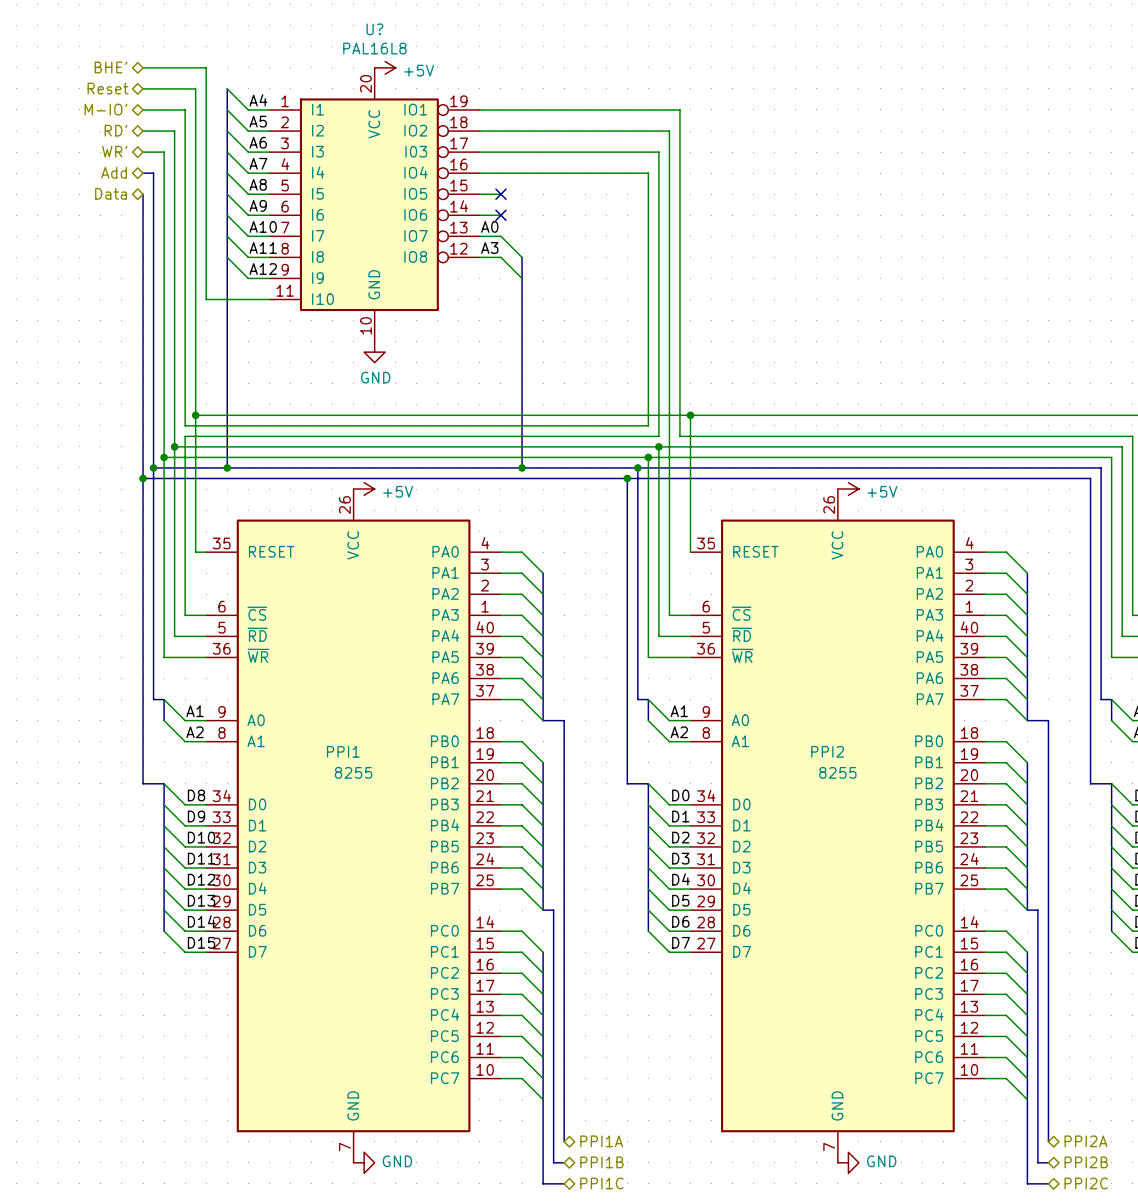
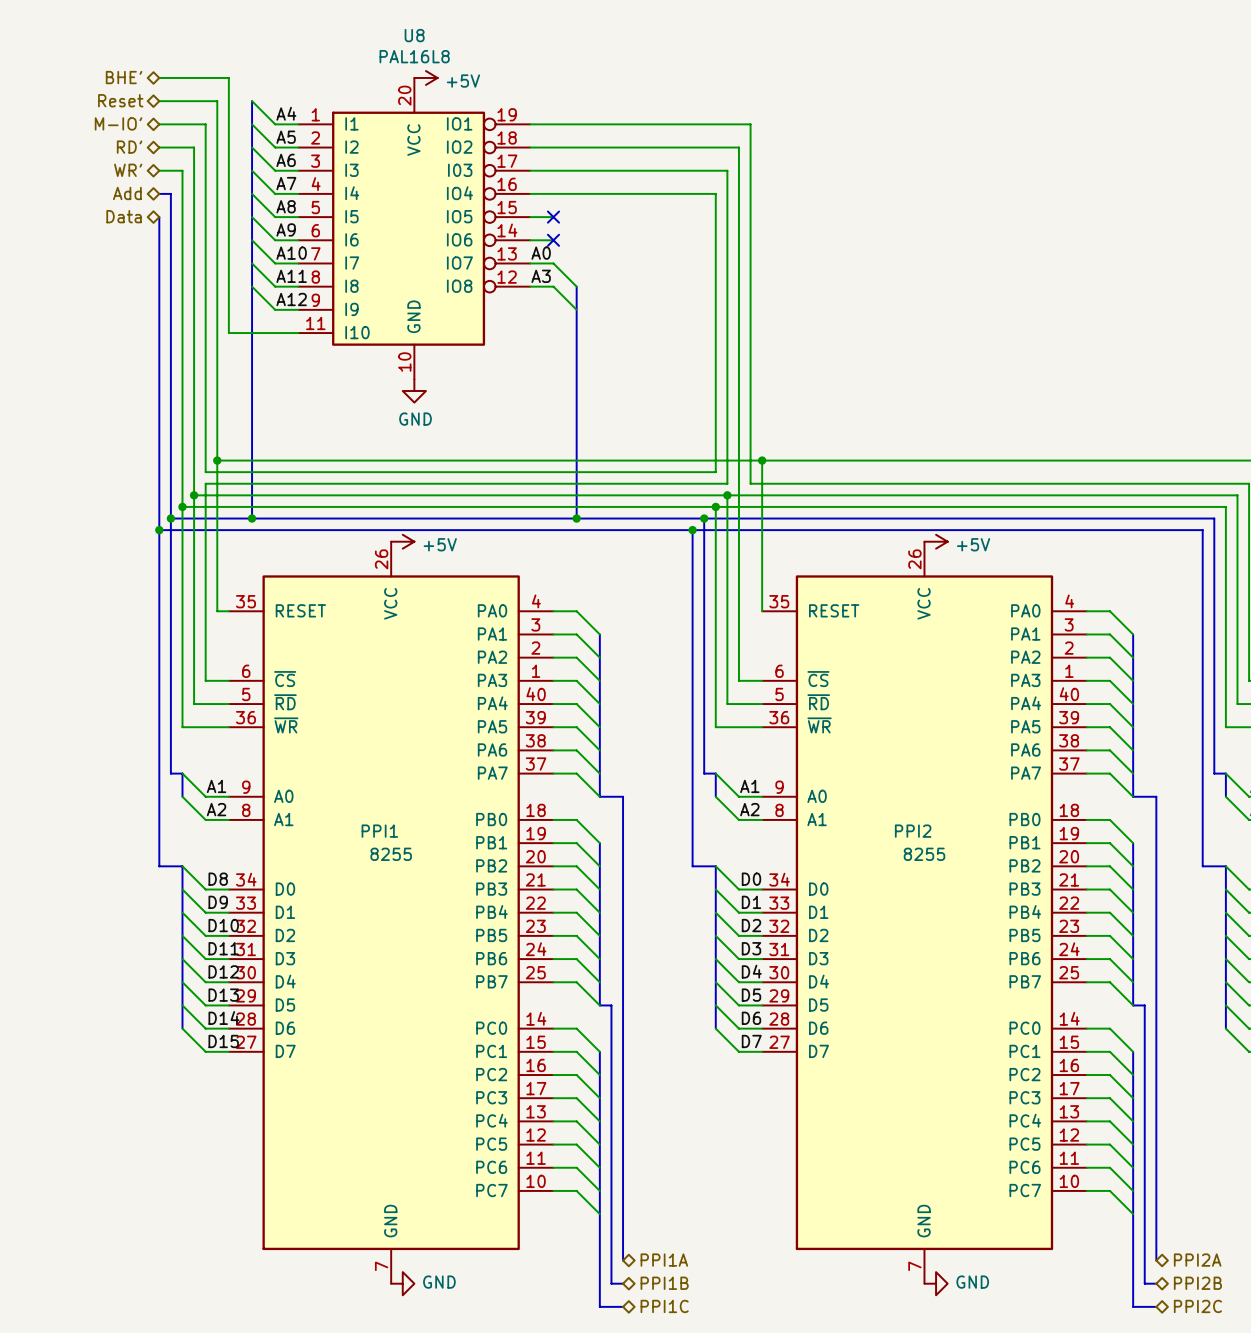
U? name: U? (374, 29) -> U8 (414, 35)

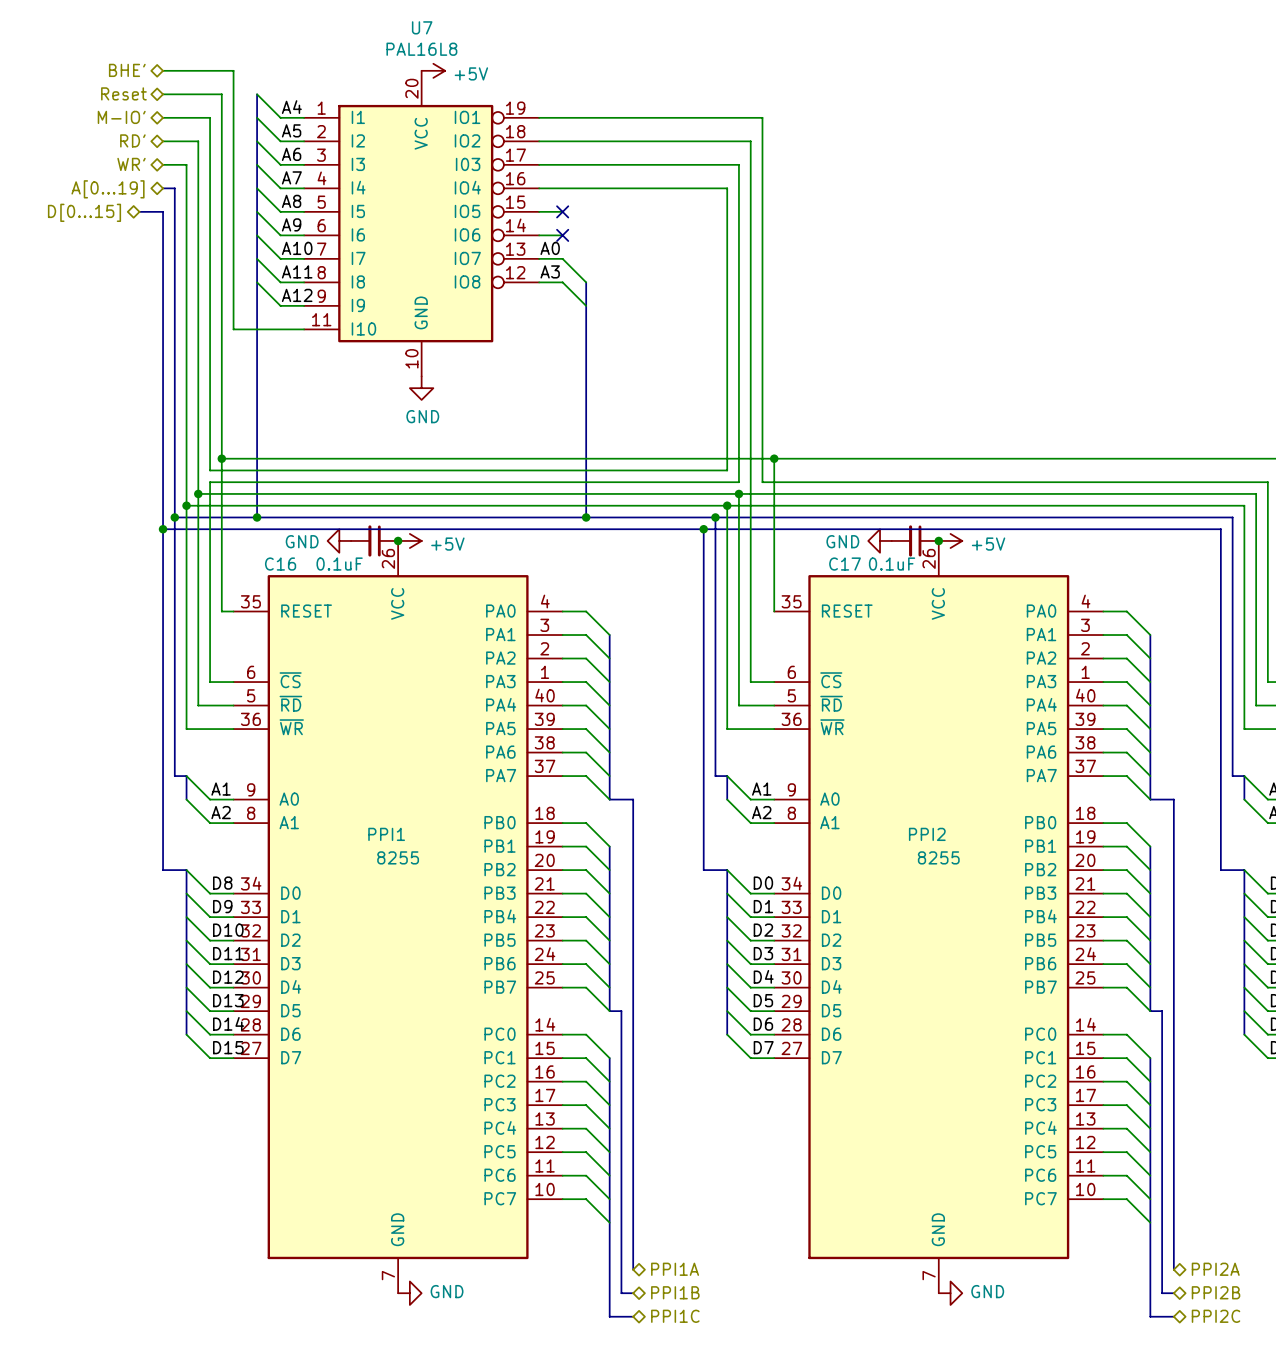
U8 name: U8 (414, 35) -> U7 (422, 27)
hierarchical label: Add (127, 193) -> A[0...19] (108, 189)
hierarchical label: Data (124, 216) -> none
bus: none -> (139, 211) (163, 211)
hierarchical label: none -> D[0...15] (84, 212)
power symbol: none -> GND (339, 540)
C16: none -> 0.1uF (374, 540)
junction: none -> (398, 540)
power symbol: none -> GND (880, 540)
C17: none -> 0.1uF (915, 540)
junction: none -> (938, 540)

